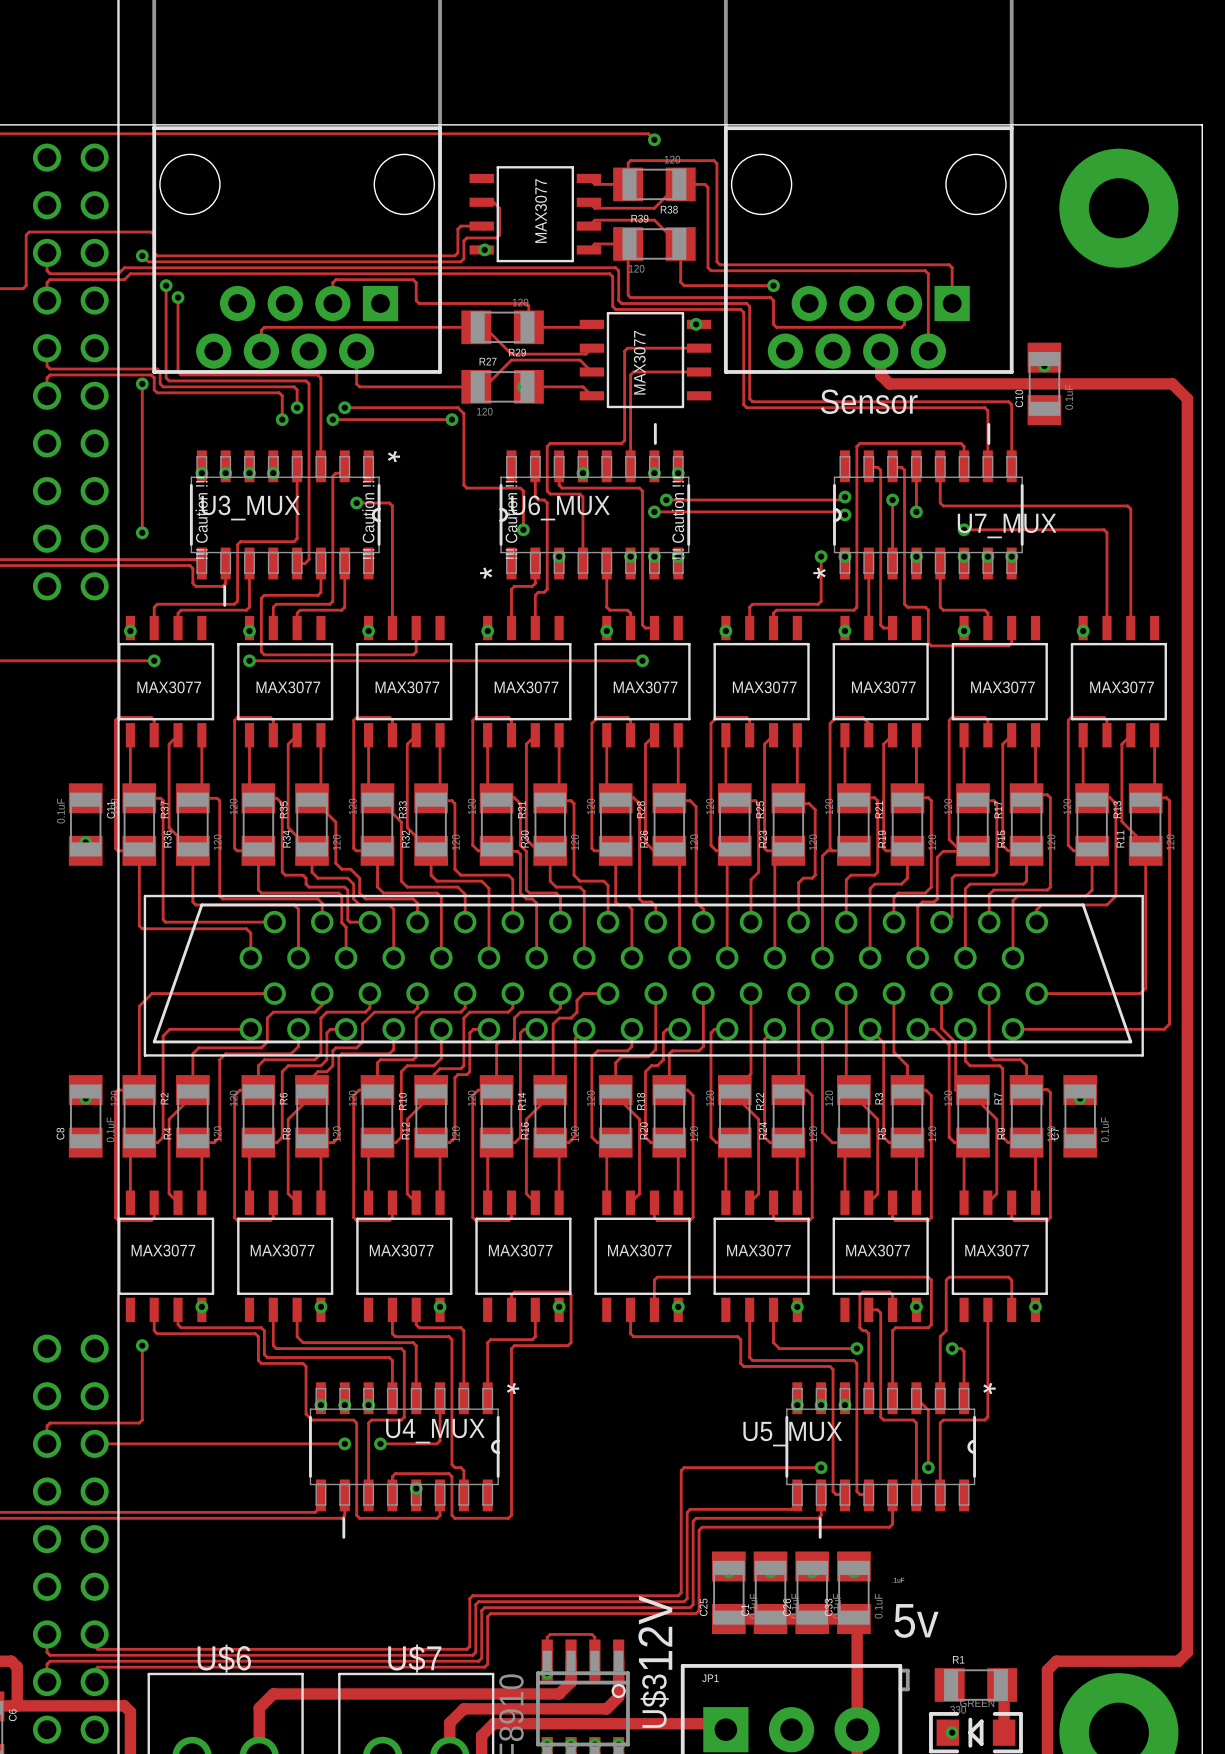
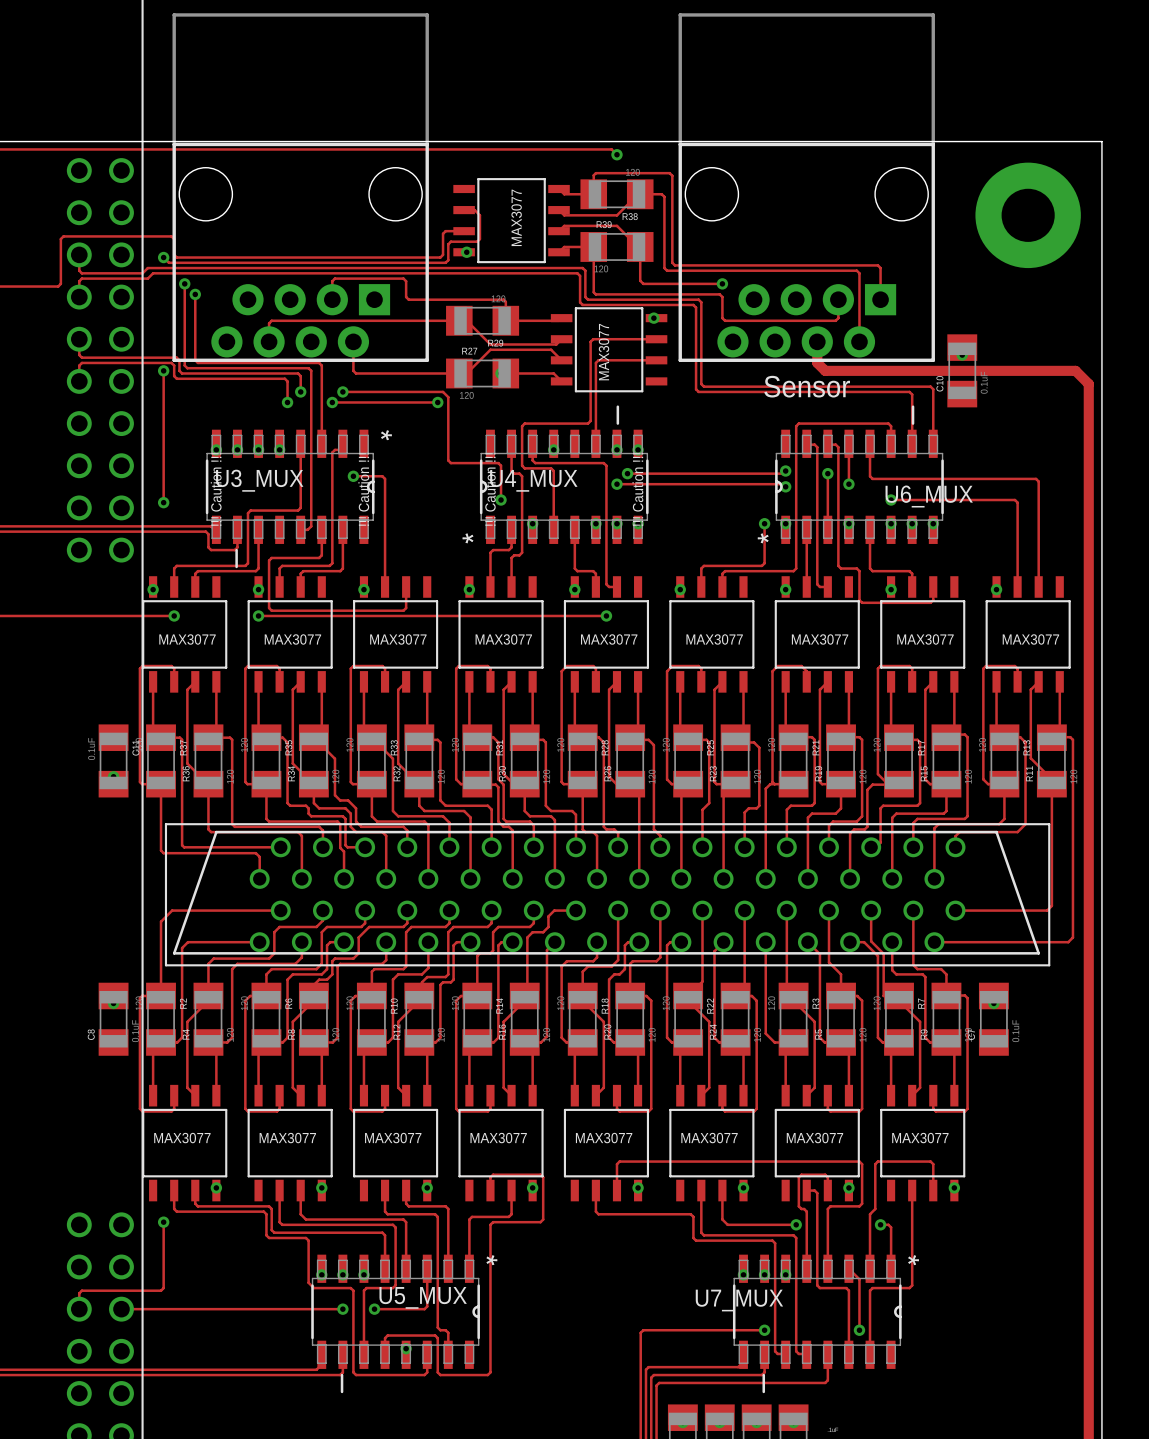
U6_MUX name: U6_MUX (560, 507) -> U4_MUX (533, 480)
U7_MUX name: U7_MUX (1007, 526) -> U6_MUX (929, 496)
U4_MUX name: U4_MUX (435, 1431) -> U5_MUX (423, 1297)
U5_MUX name: U5_MUX (792, 1434) -> U7_MUX (739, 1300)

